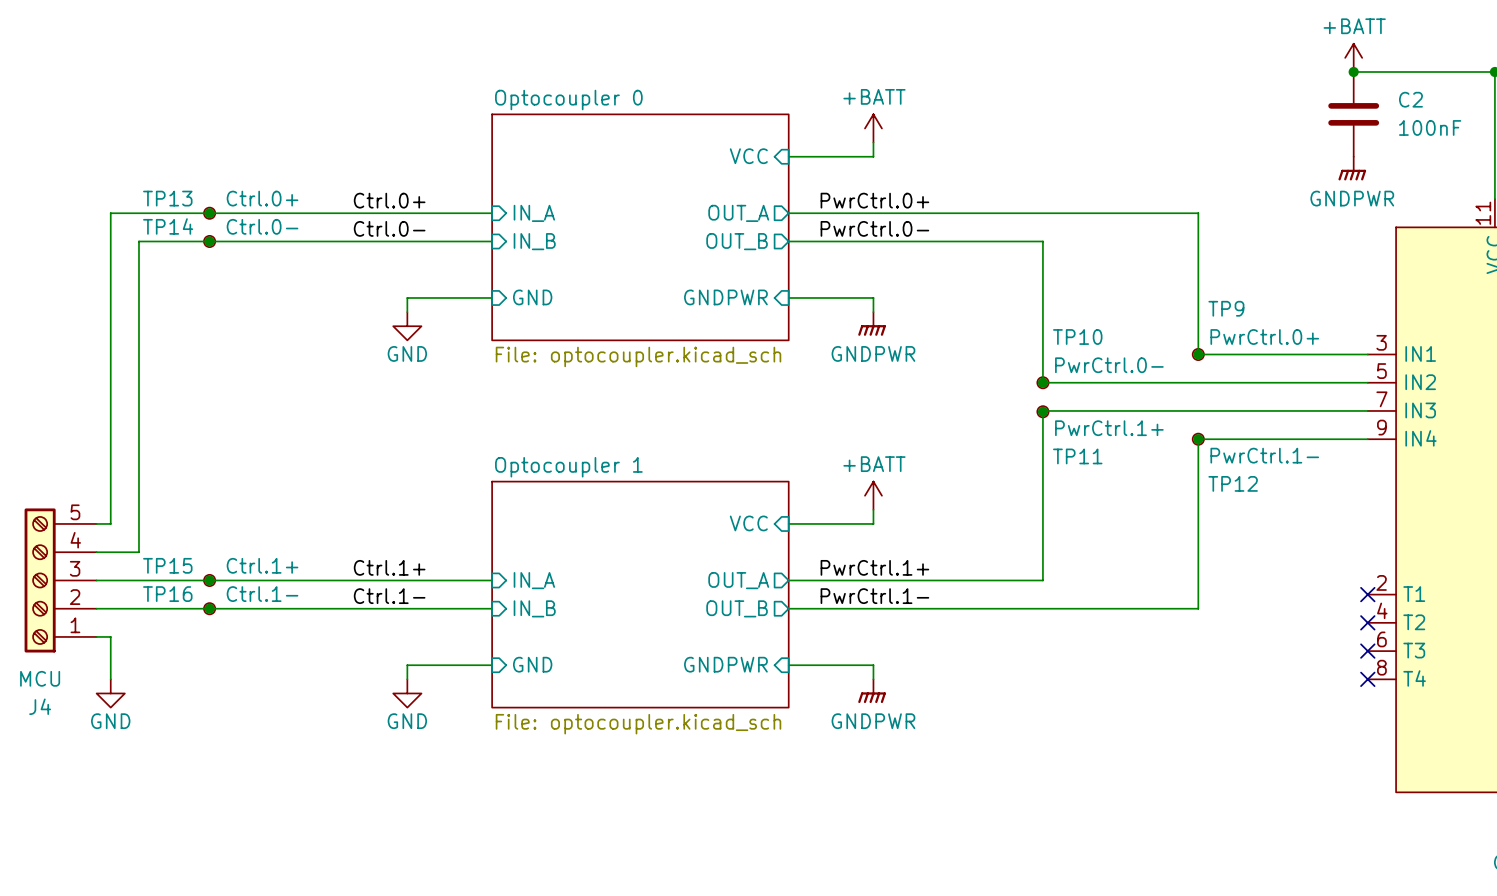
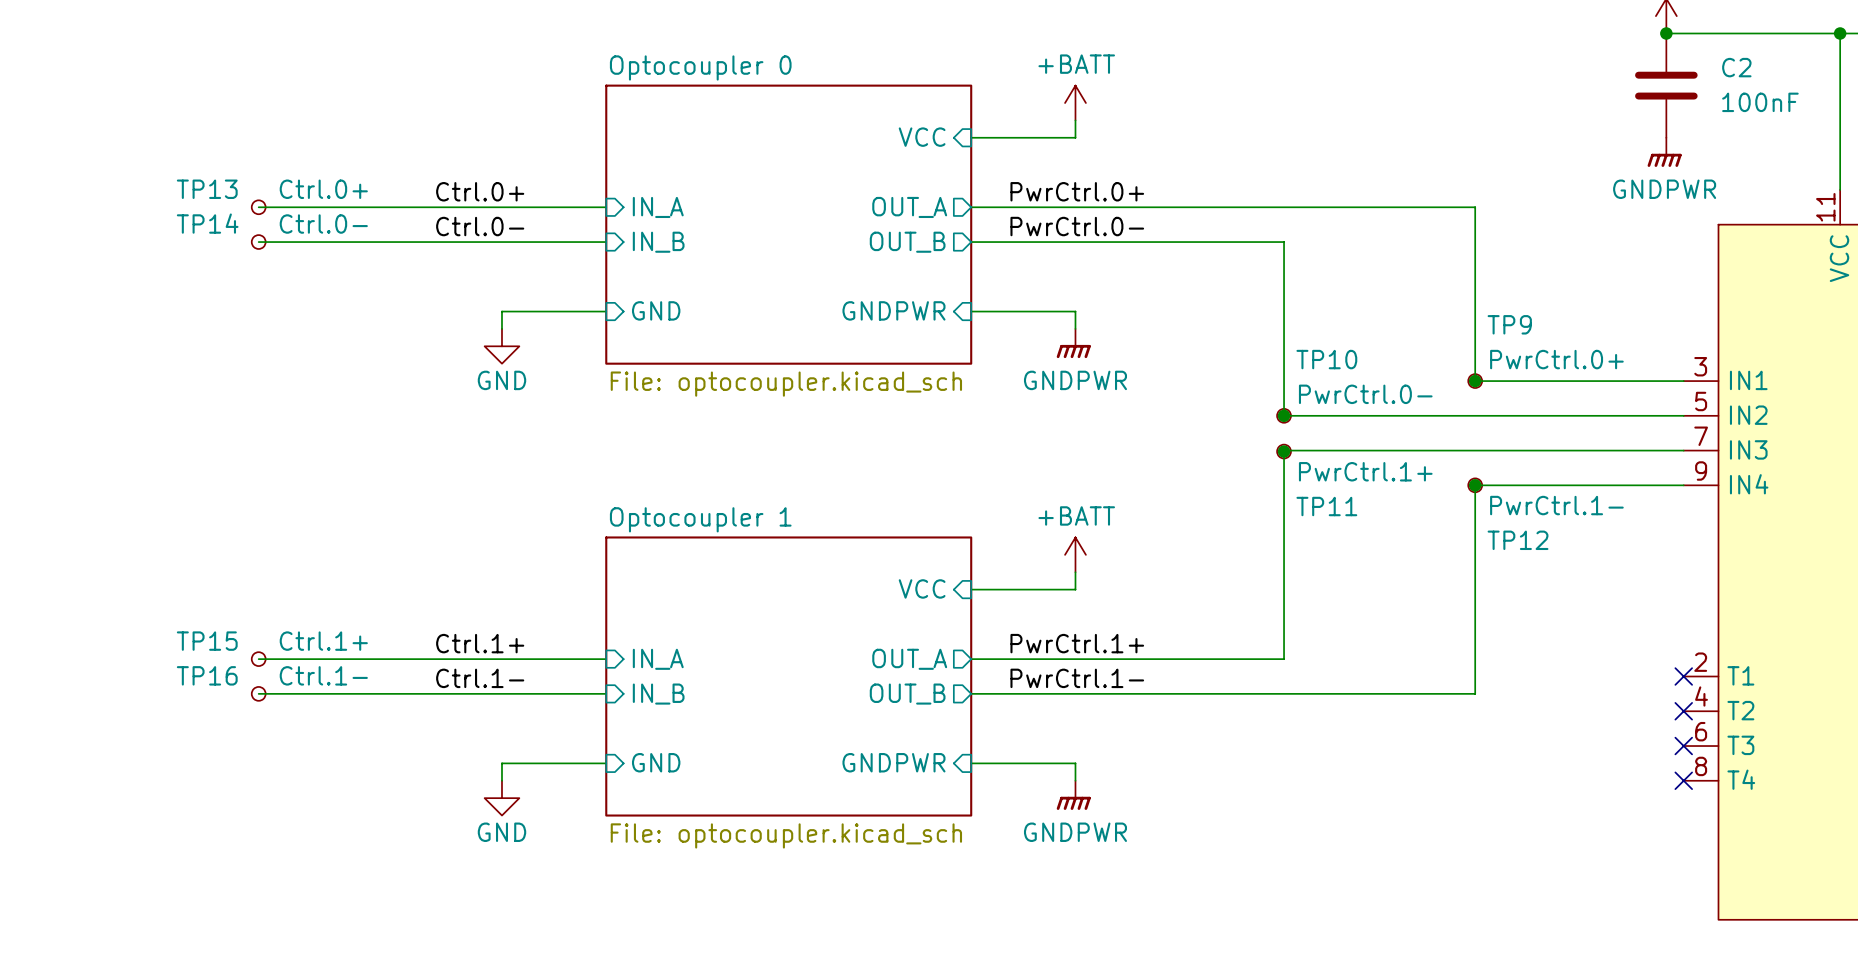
wire: (209, 213) (110, 213) (110, 523) (96, 523) -> none
junction: (209, 213) -> none
wire: (209, 241) (138, 241) (138, 552) (96, 552) -> none
junction: (209, 241) -> none
J4: MCU (60, 580) -> none
wire: (96, 580) (209, 580) -> none
junction: (209, 580) -> none
wire: (96, 608) (209, 608) -> none
junction: (209, 608) -> none
wire: (96, 636) (110, 636) (110, 679) -> none
power symbol: GND (110, 693) -> none

